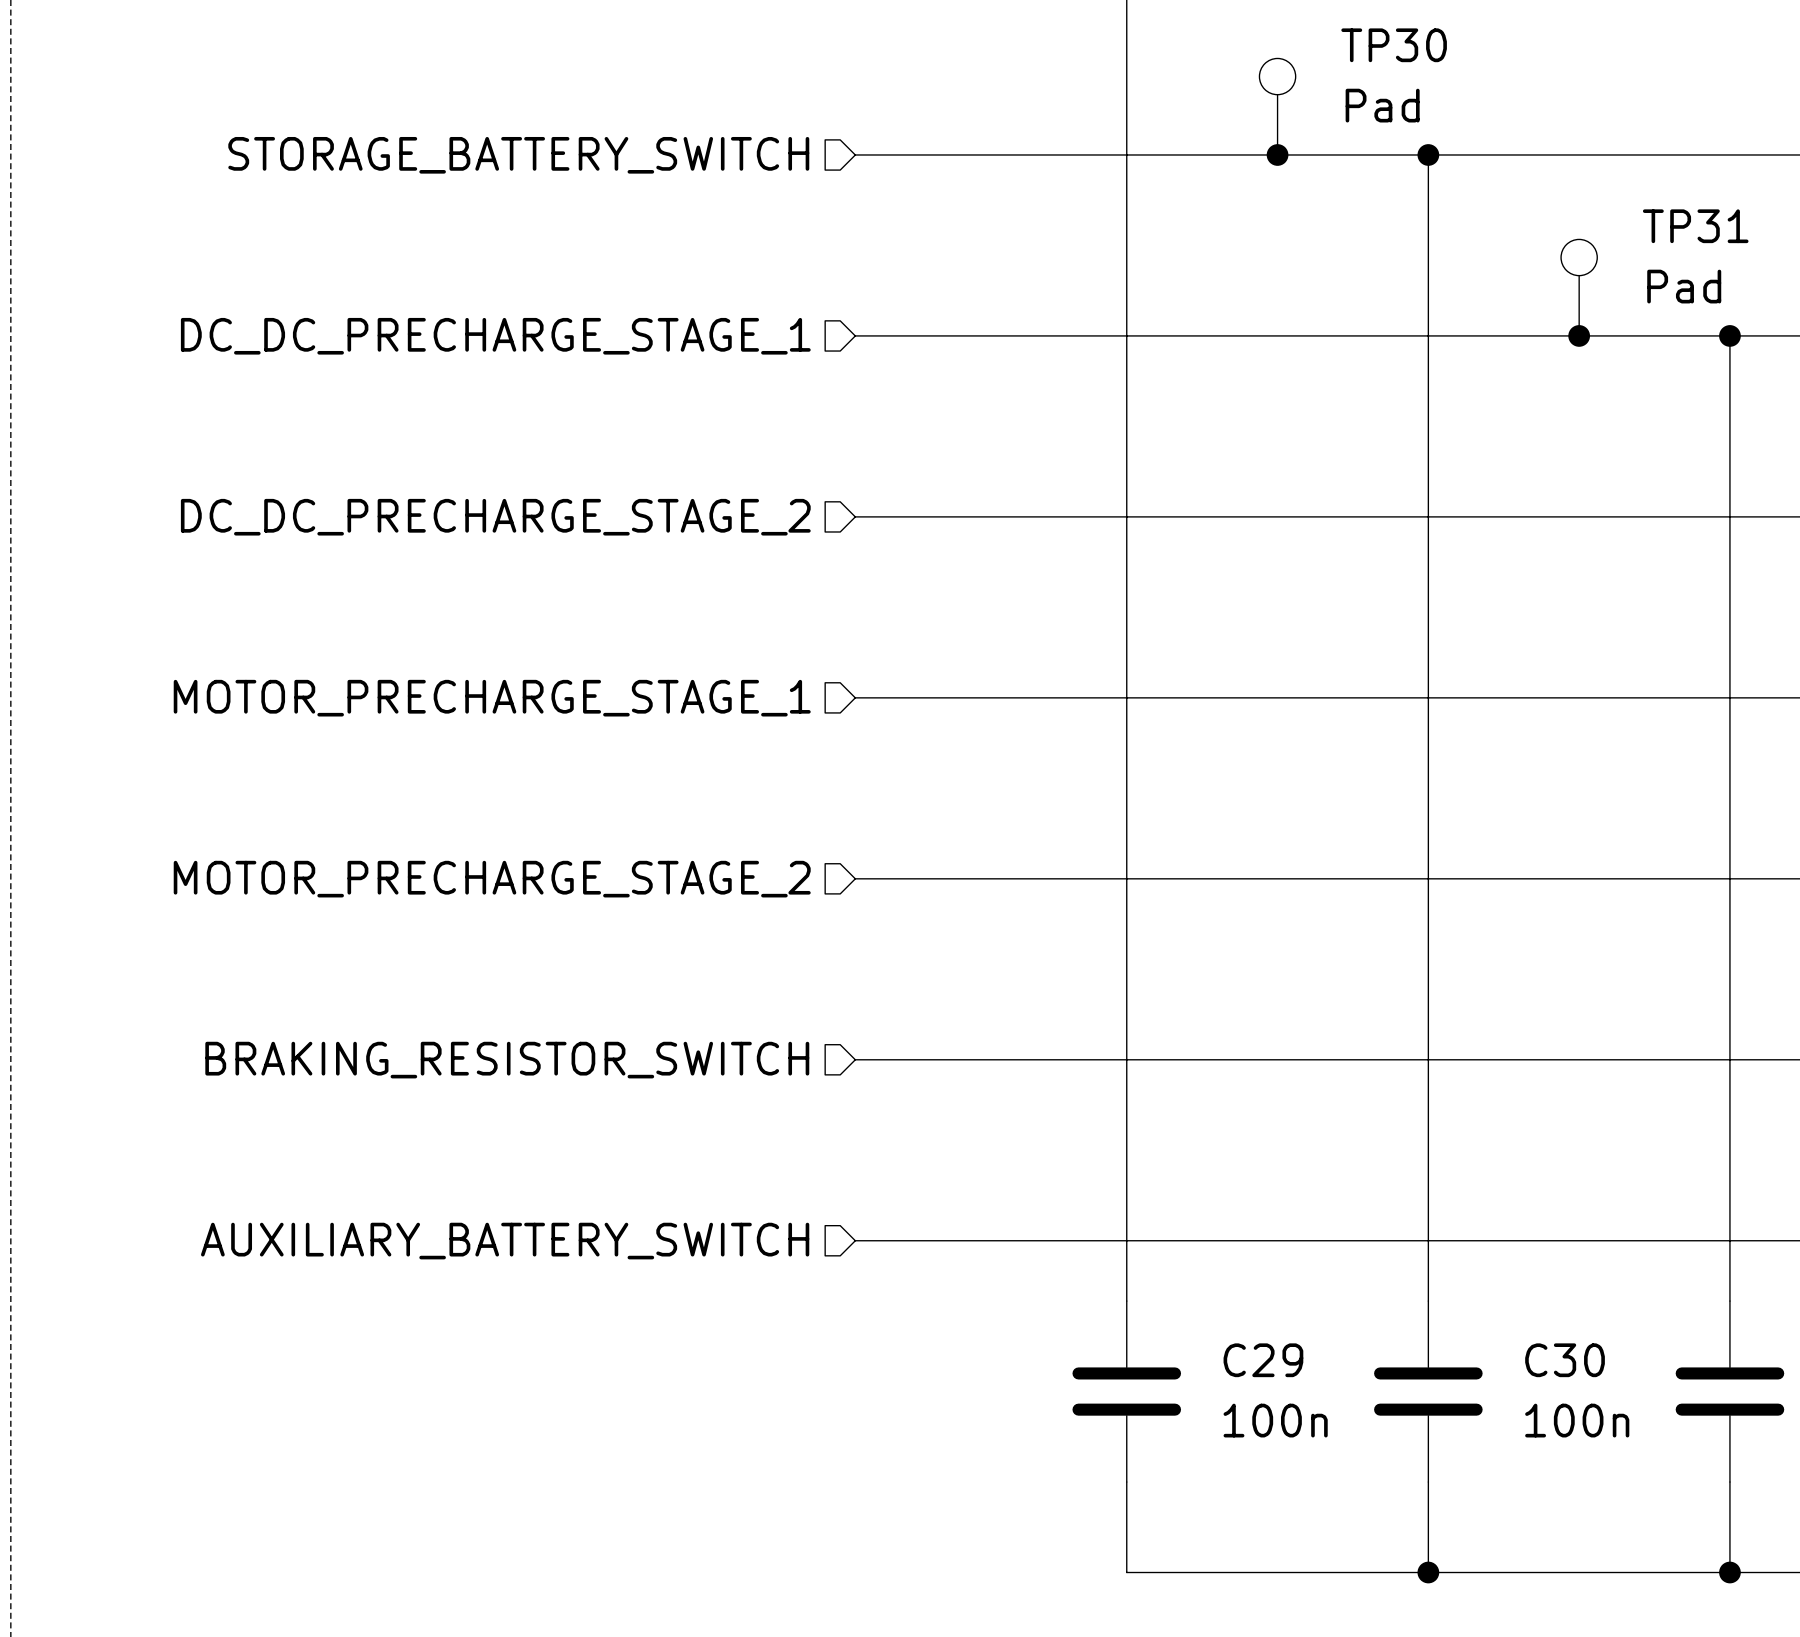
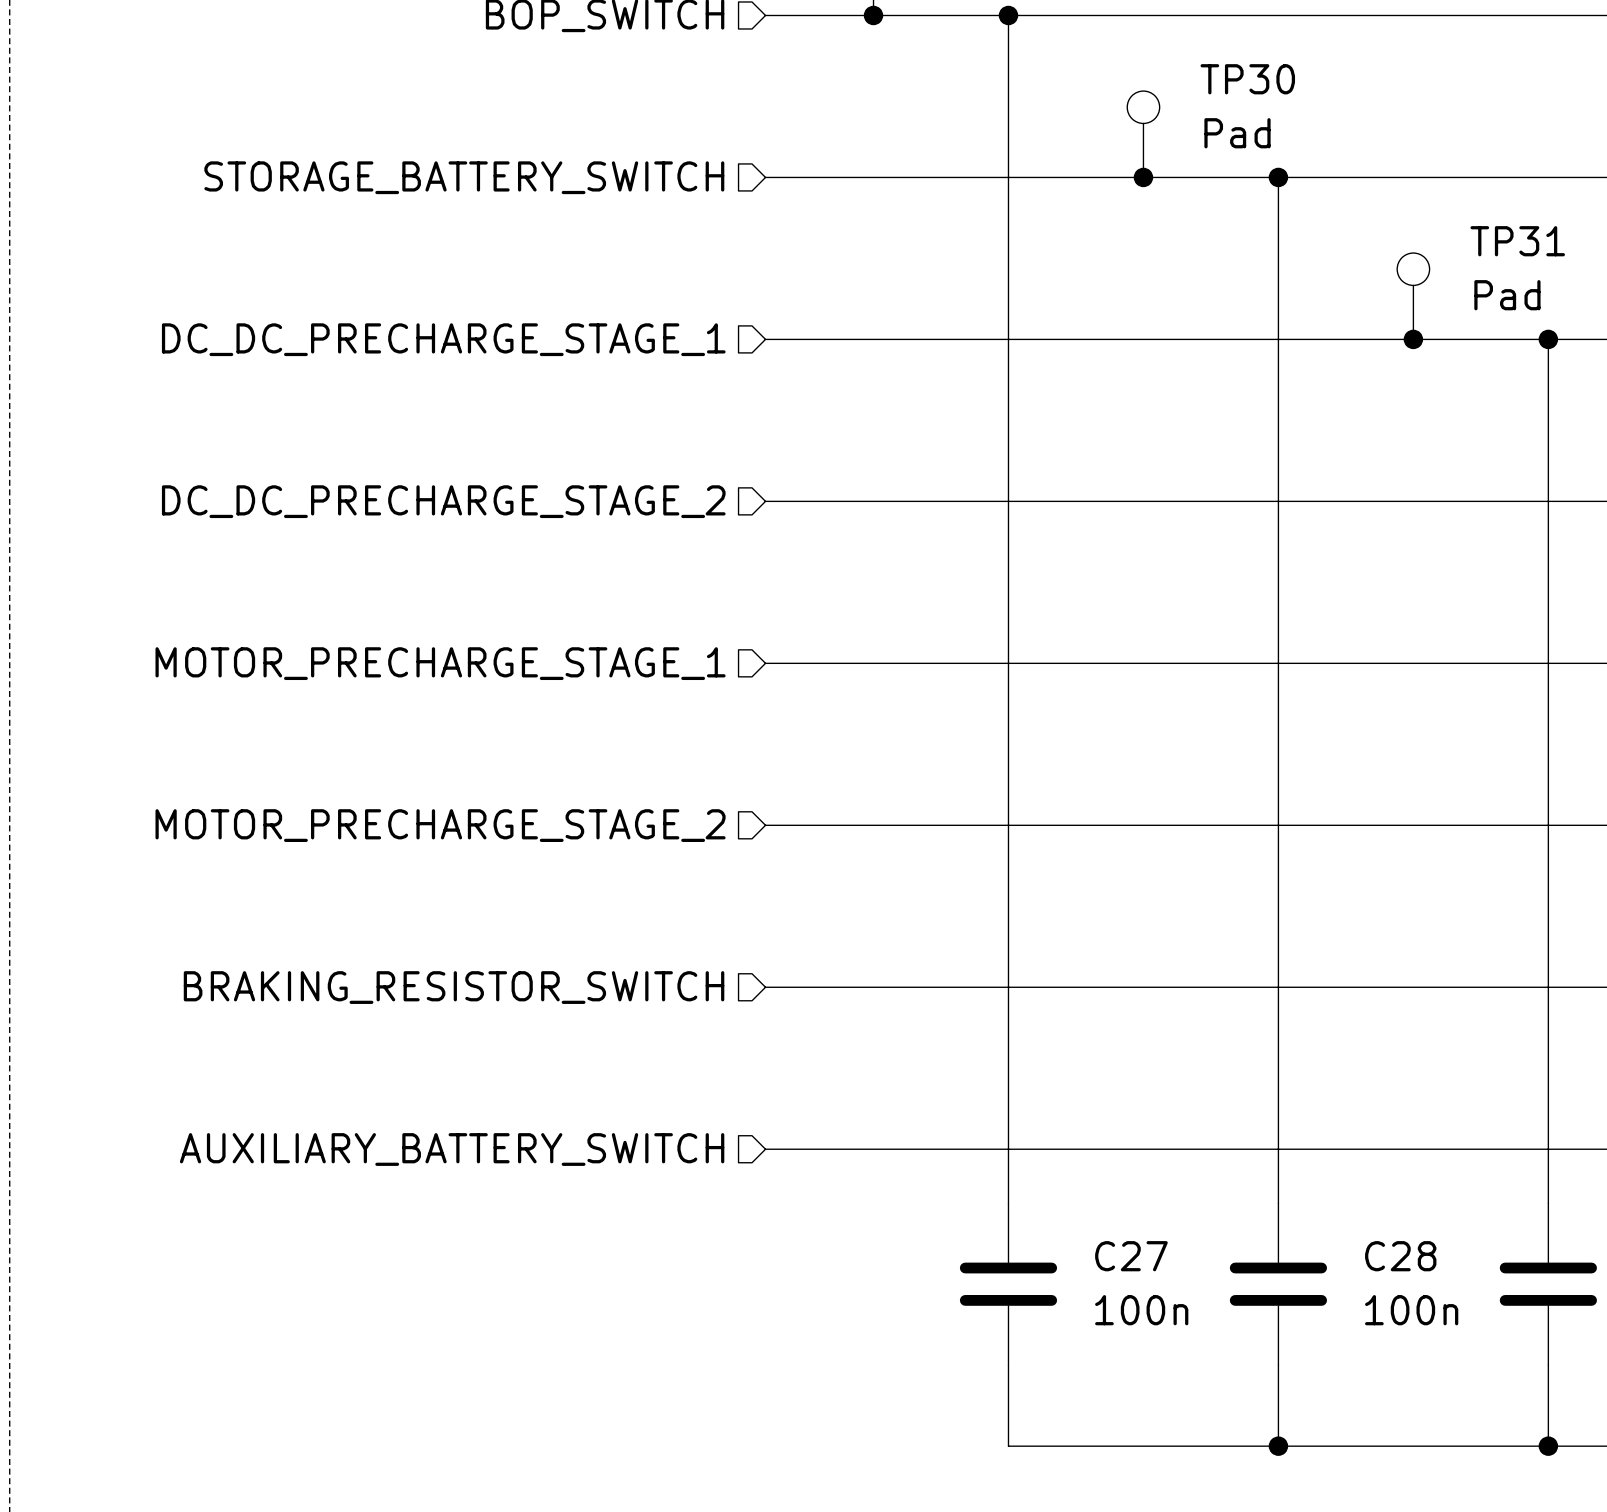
C29 name: C29 (1263, 1360) -> C27 (1131, 1256)
C30 name: C30 (1565, 1360) -> C28 (1400, 1256)

